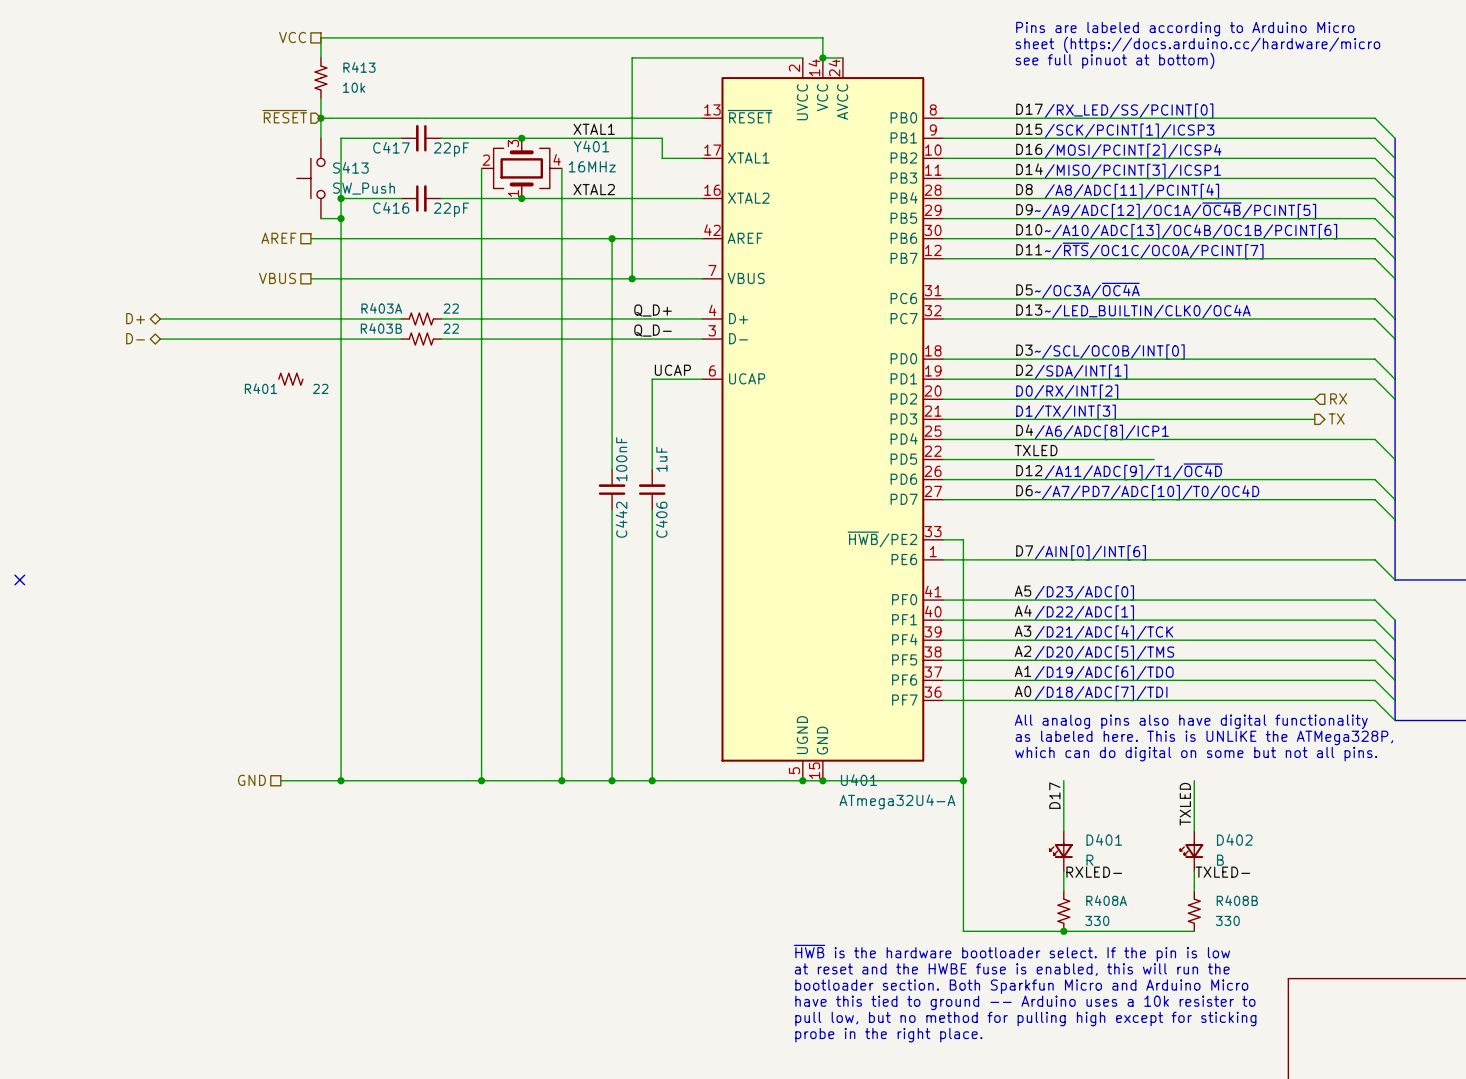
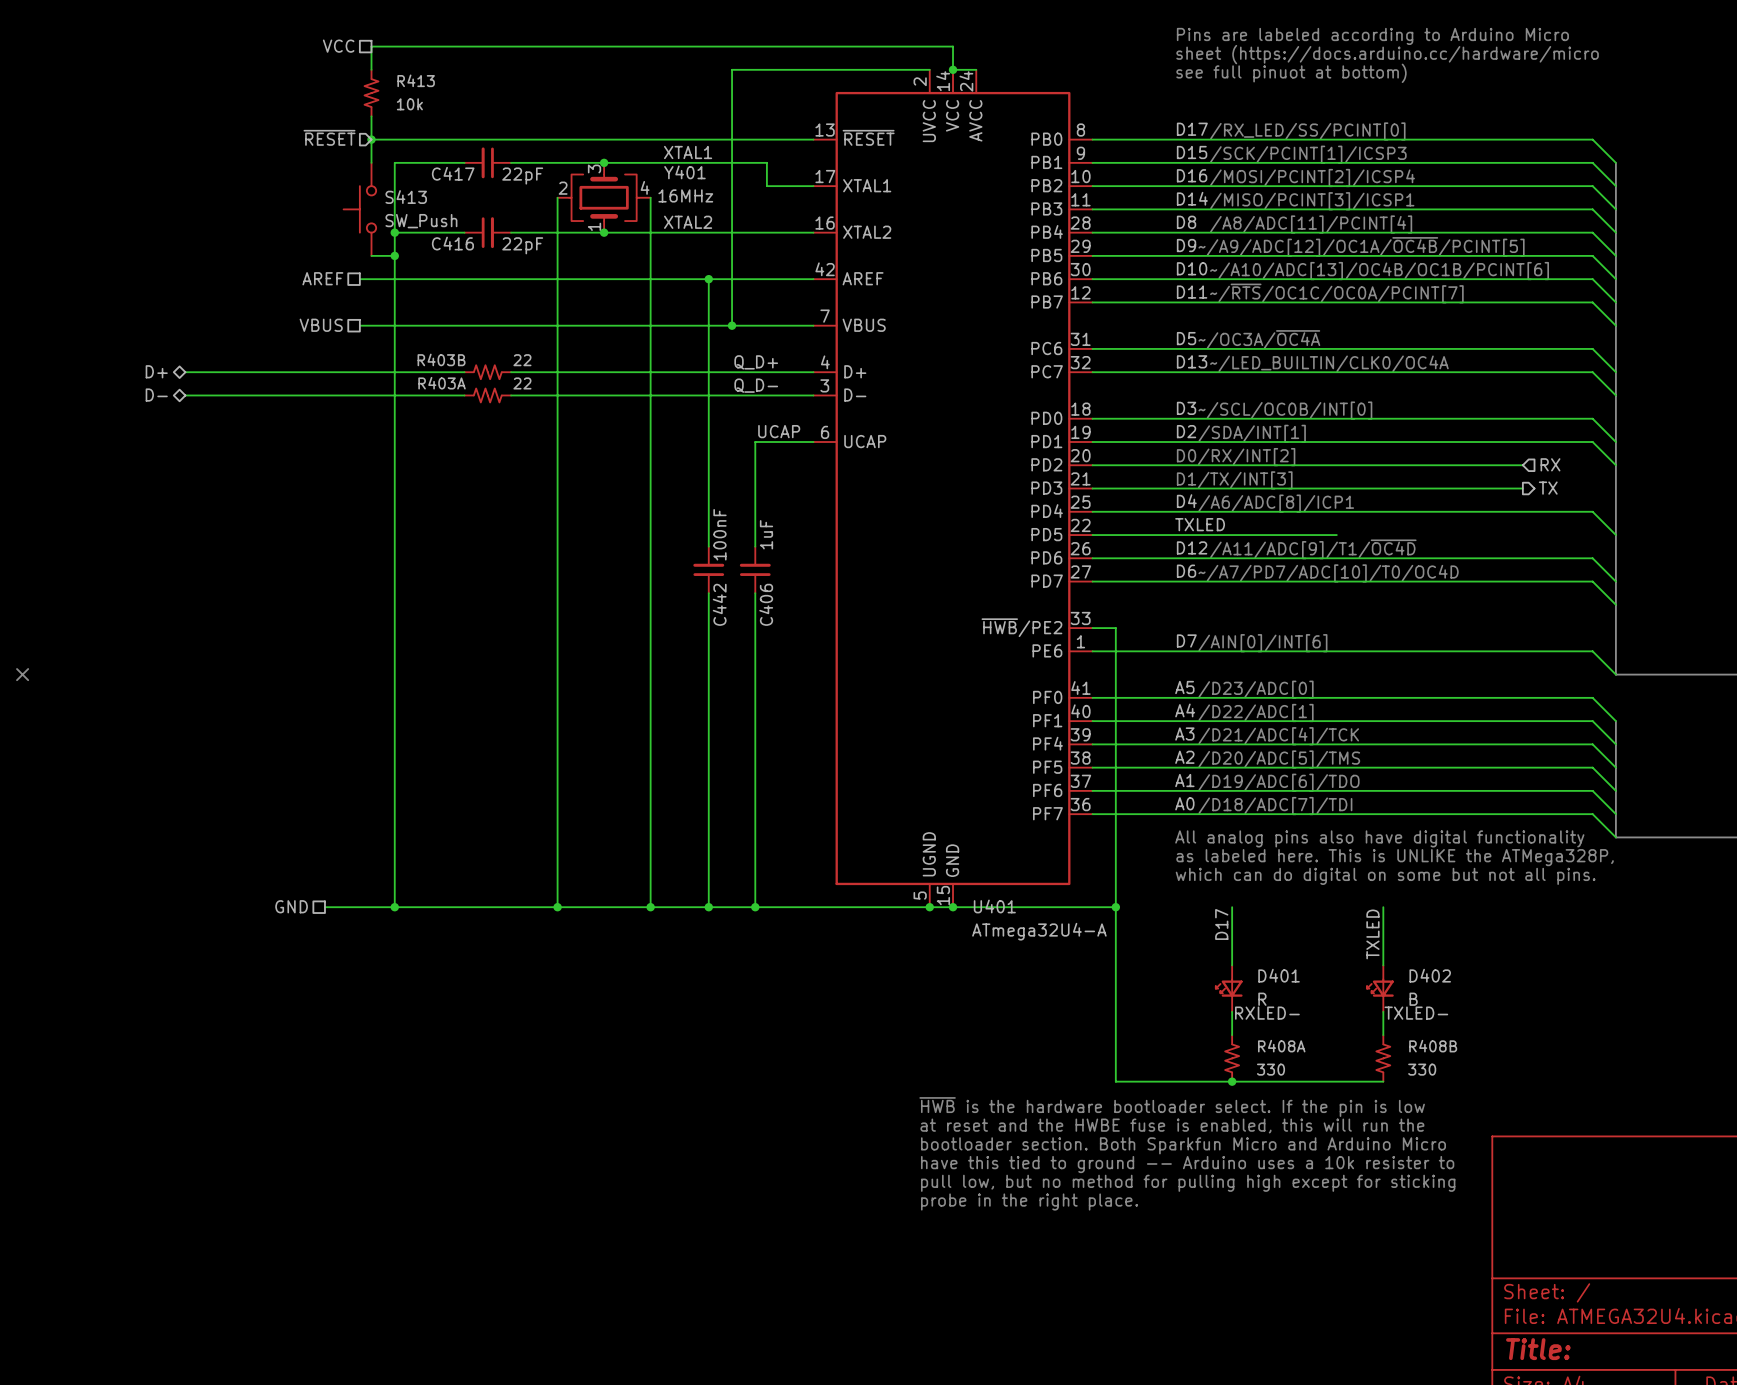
R403A name: R403A (381, 308) -> R403B (441, 359)
R403B name: R403B (381, 328) -> R403A (442, 383)
R401: 22 (290, 379) -> none

